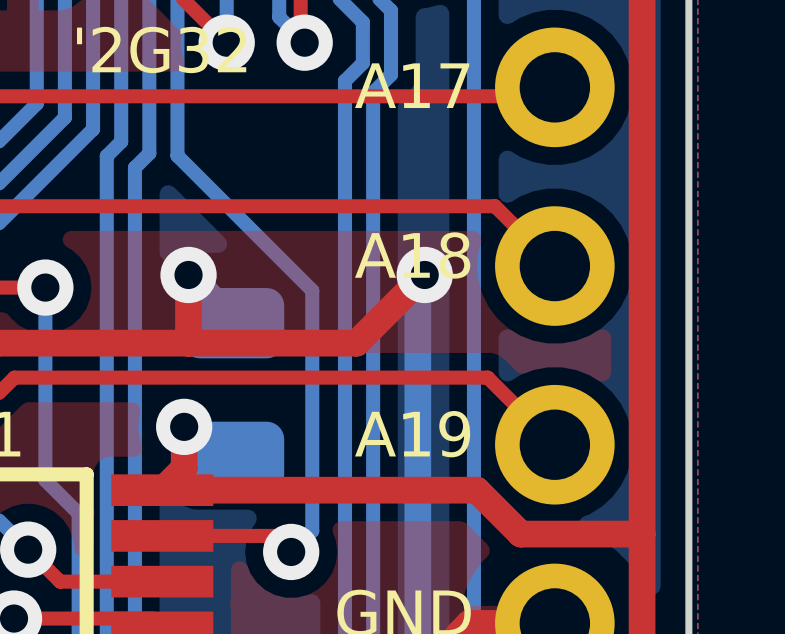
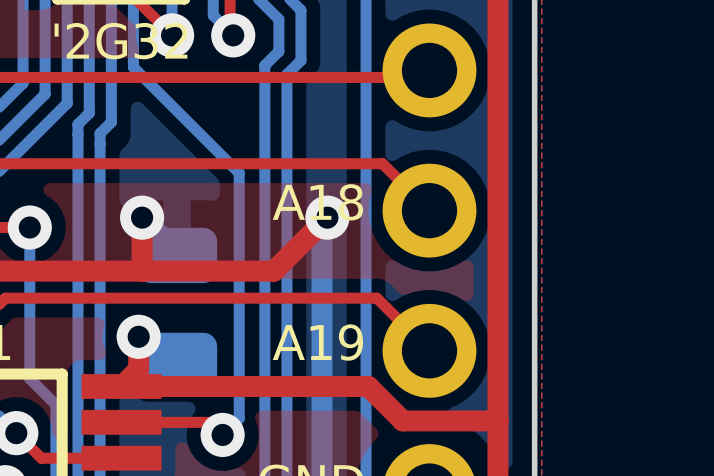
bottom track: (177, 83) (177, 155) (312, 290) -> (133, 67) (239, 173) (239, 229)
text: A17 (412, 85) -> none

